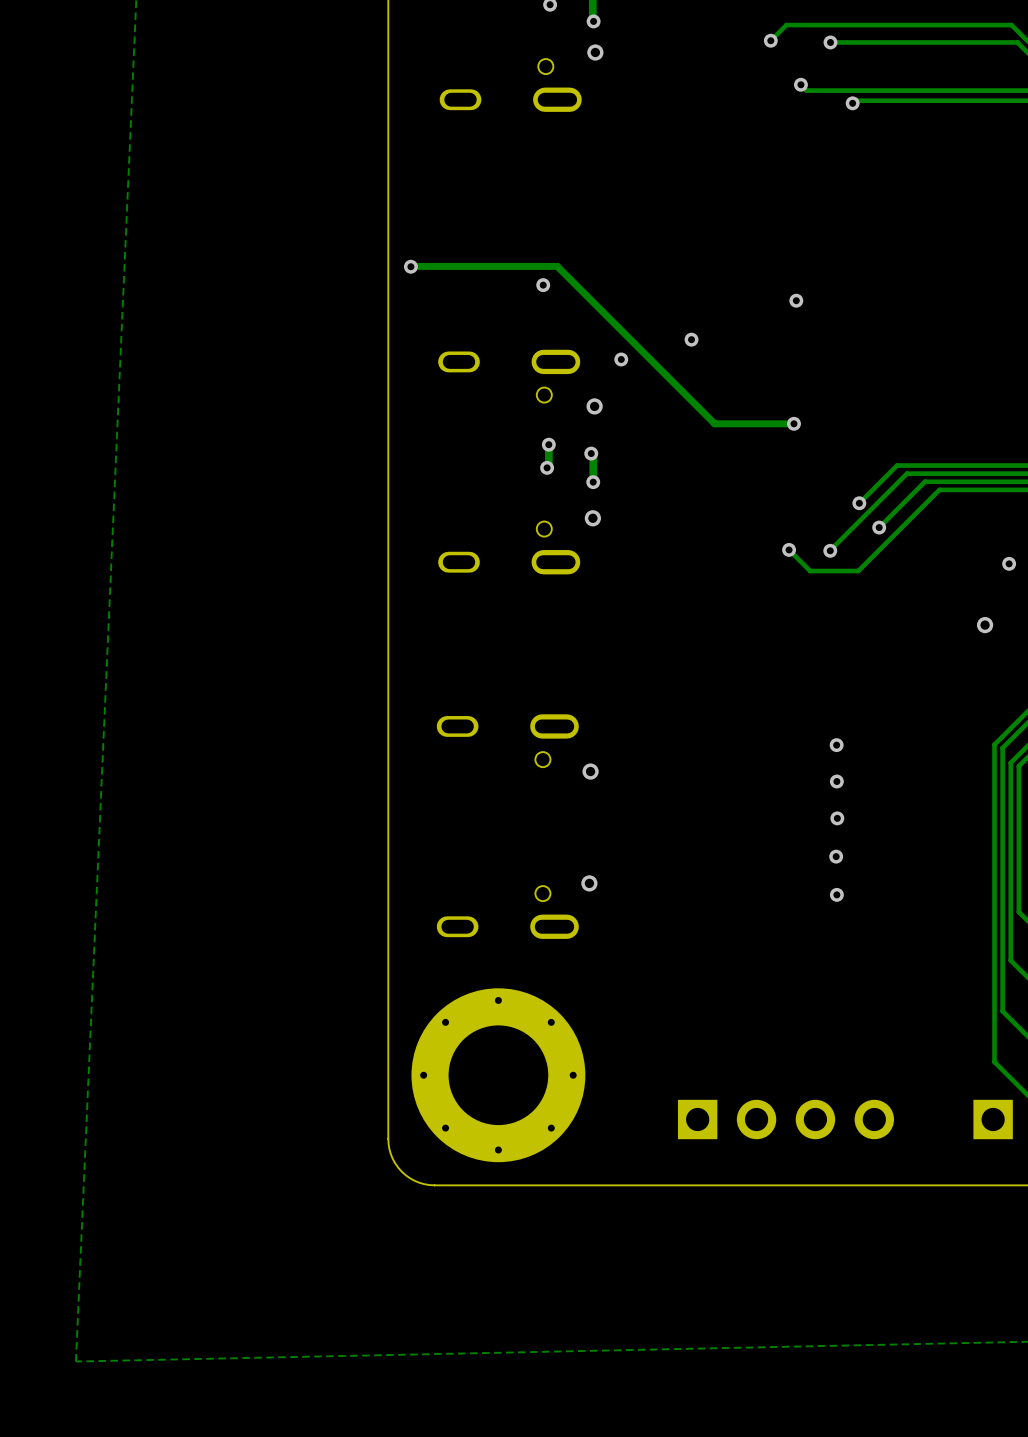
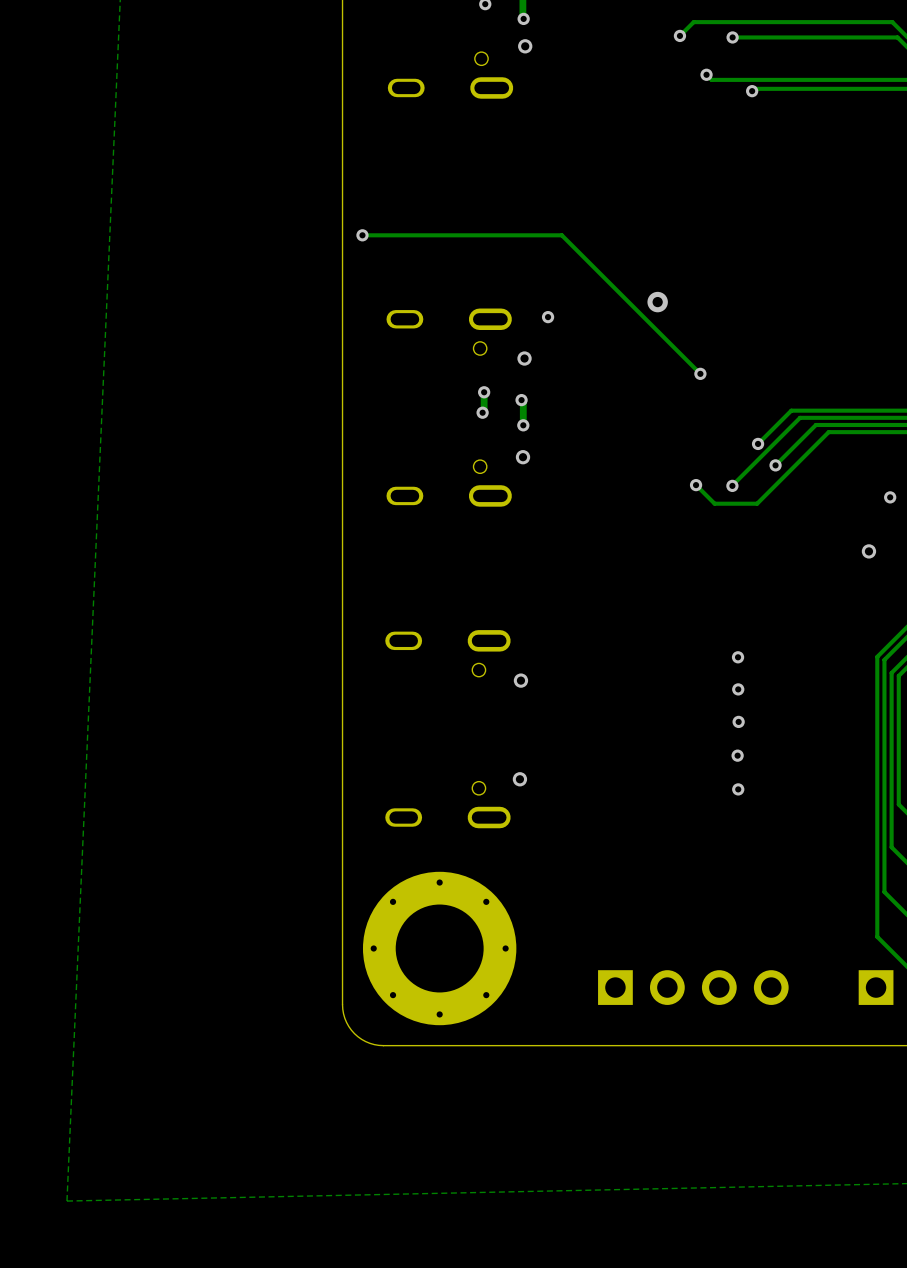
track: (410, 266) (557, 266) (714, 423) (793, 423) -> (362, 235) (561, 235) (700, 373)
via: (543, 285) -> none
via: (796, 300) -> none
via: (691, 339) -> none
via: none -> (657, 302)

